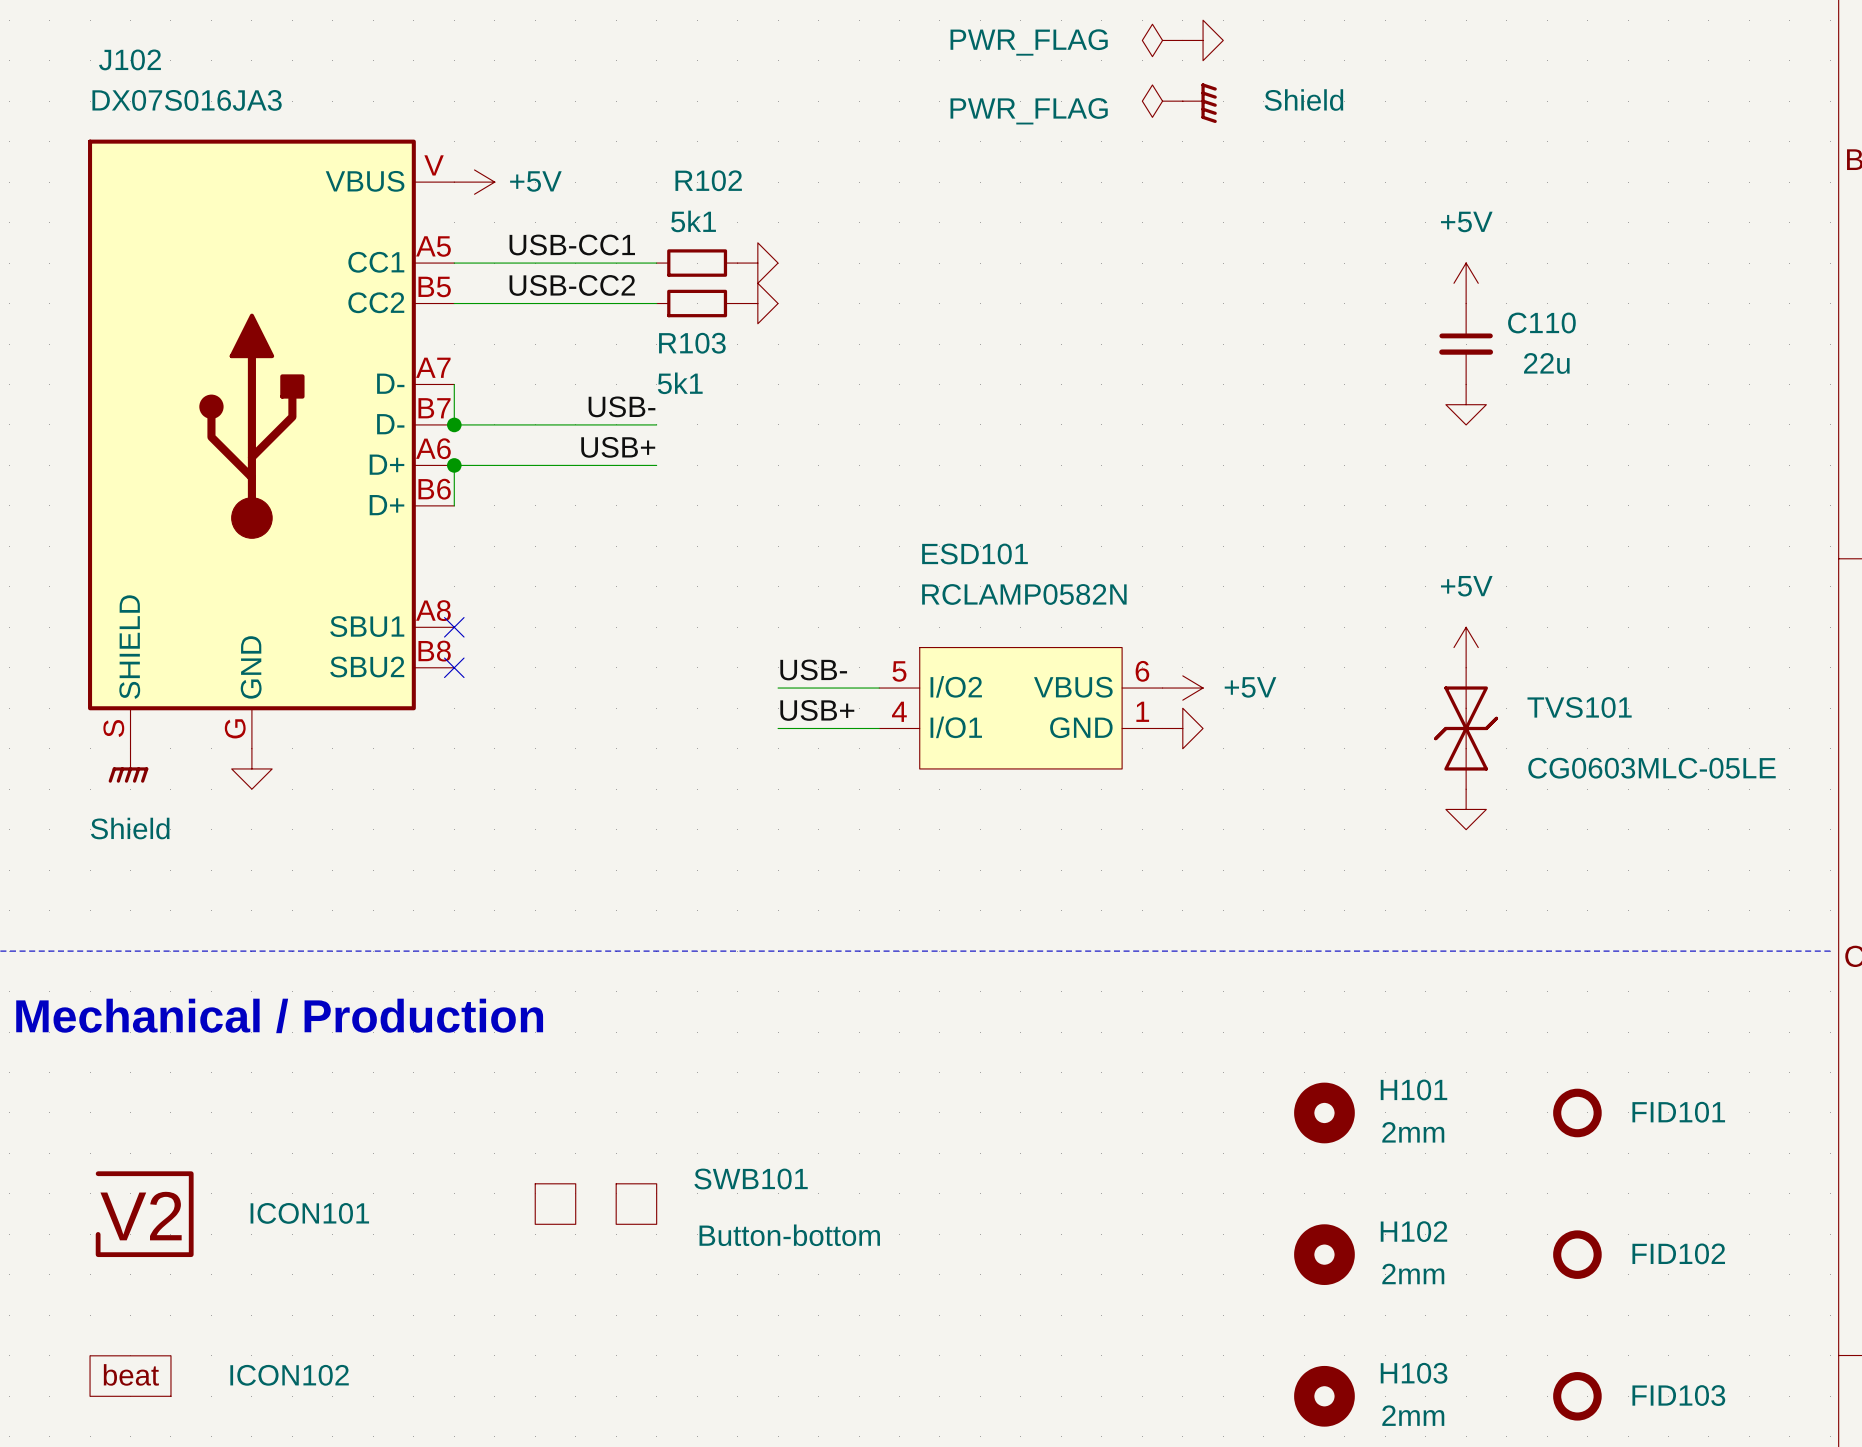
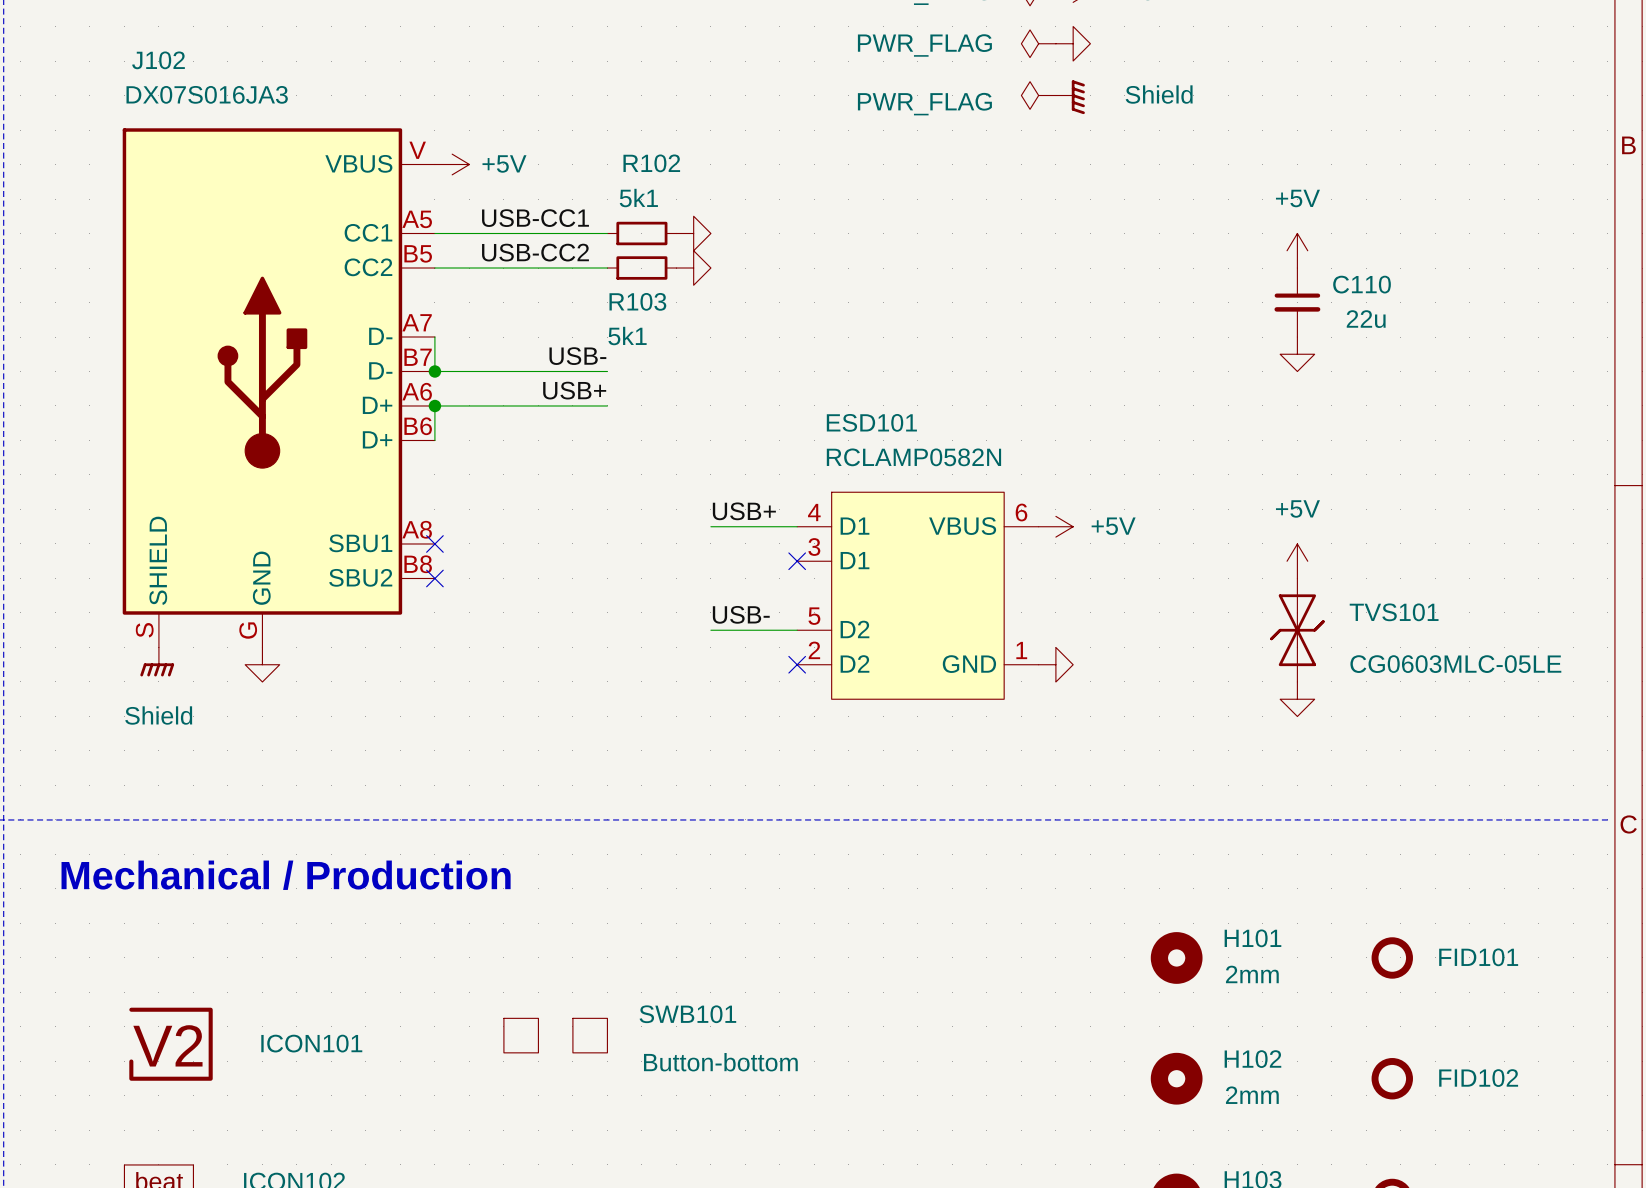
ESD101 name position: ESD101 (975, 554) -> ESD101 (871, 422)
label: none -> USB+ (744, 511)
ESD101 value position: RCLAMP0582N (1024, 594) -> RCLAMP0582N (913, 457)
ESD101 symbol: [879, 647, 1163, 769] -> [797, 492, 1039, 700]
no-connect mark: none -> (797, 561)
label: USB- (813, 669) -> none
wire: (778, 688) (879, 688) -> (710, 526) (797, 526)
power symbol position: +5V (1182, 688) -> +5V (1055, 526)
label: USB+ (817, 710) -> USB- (741, 614)
power symbol position: (1182, 728) -> (1055, 664)
no-connect mark: none -> (797, 664)

